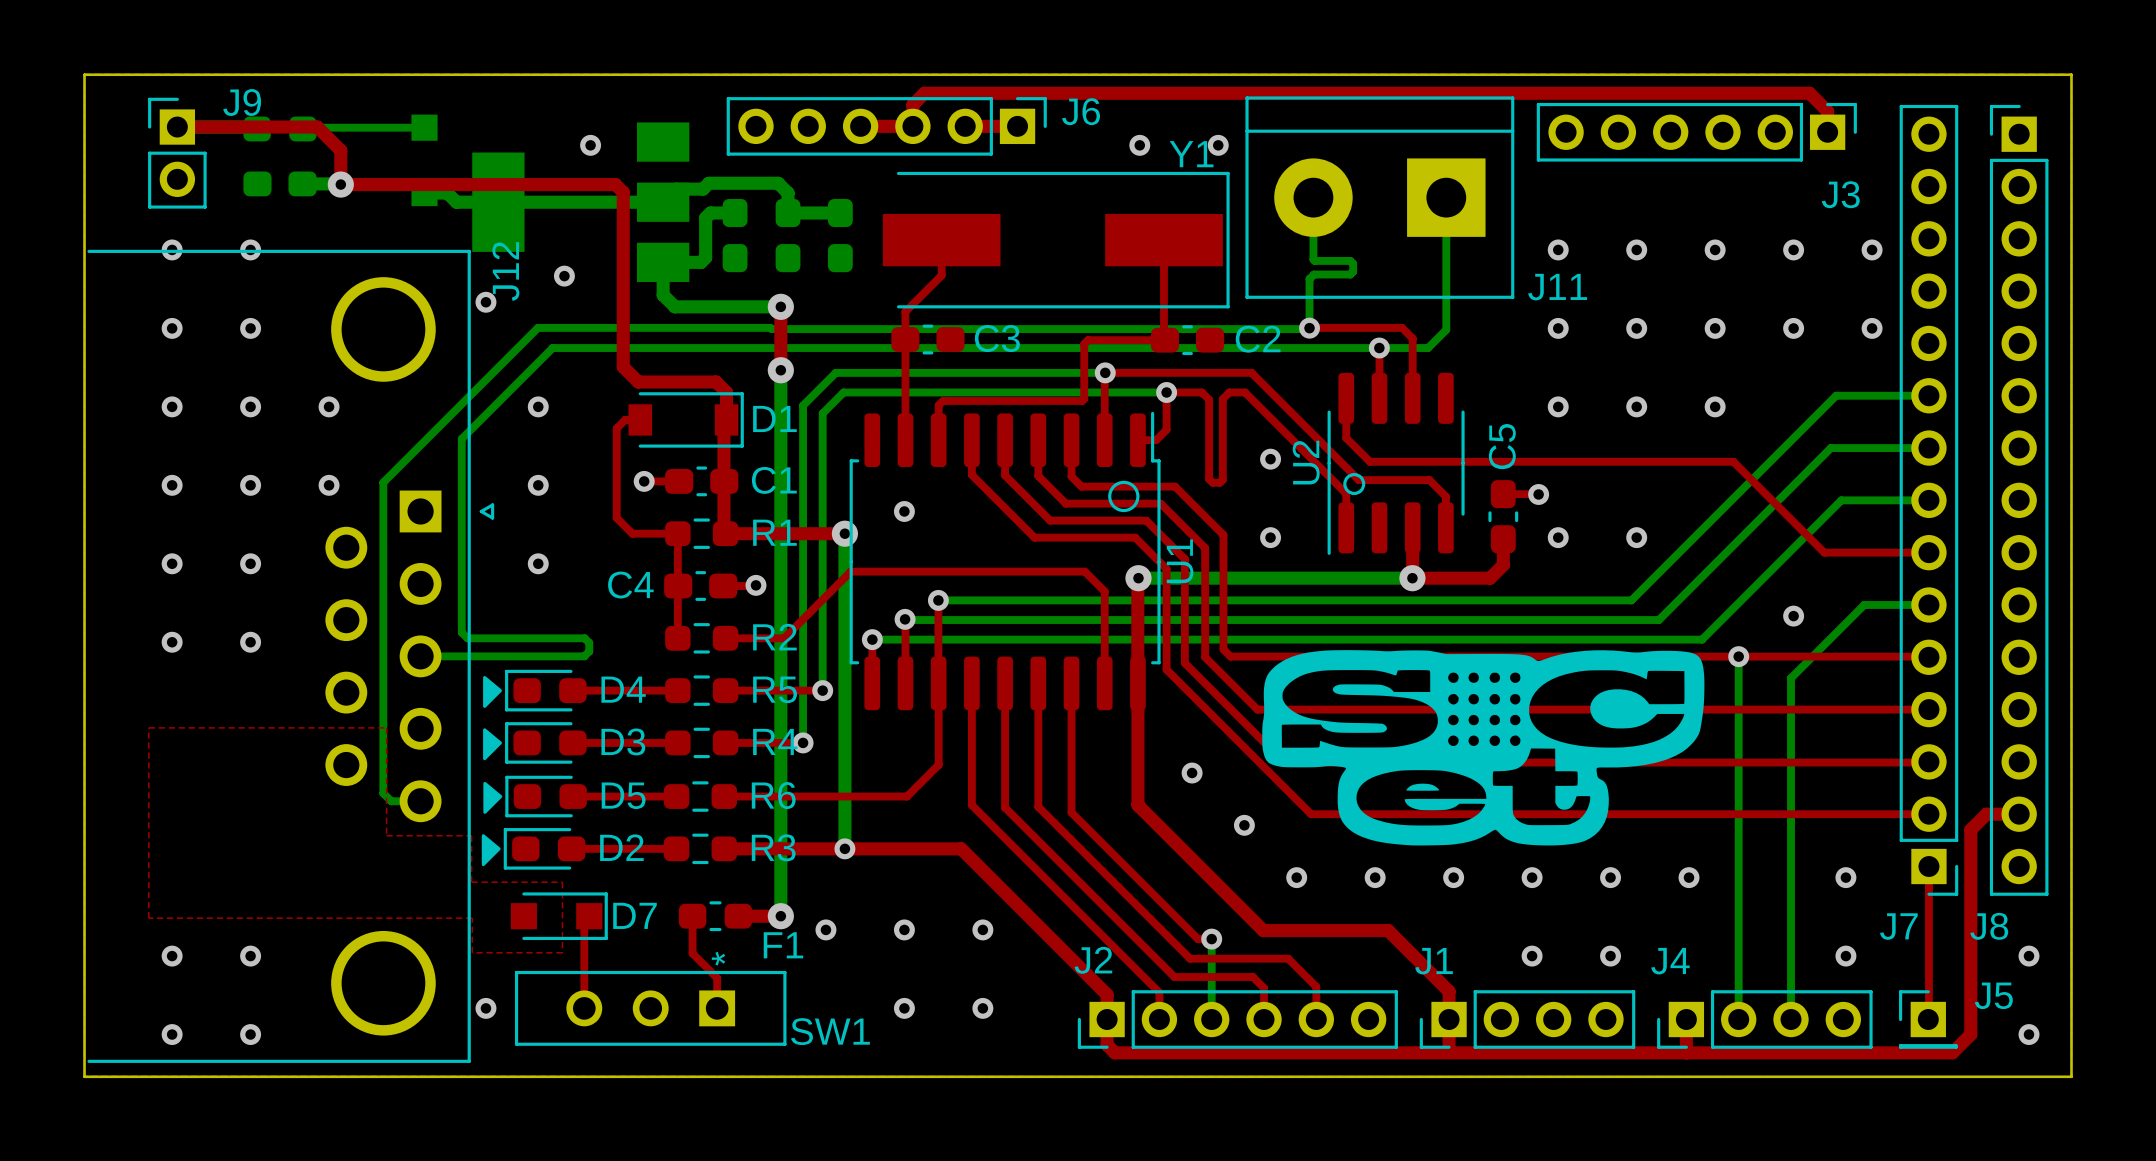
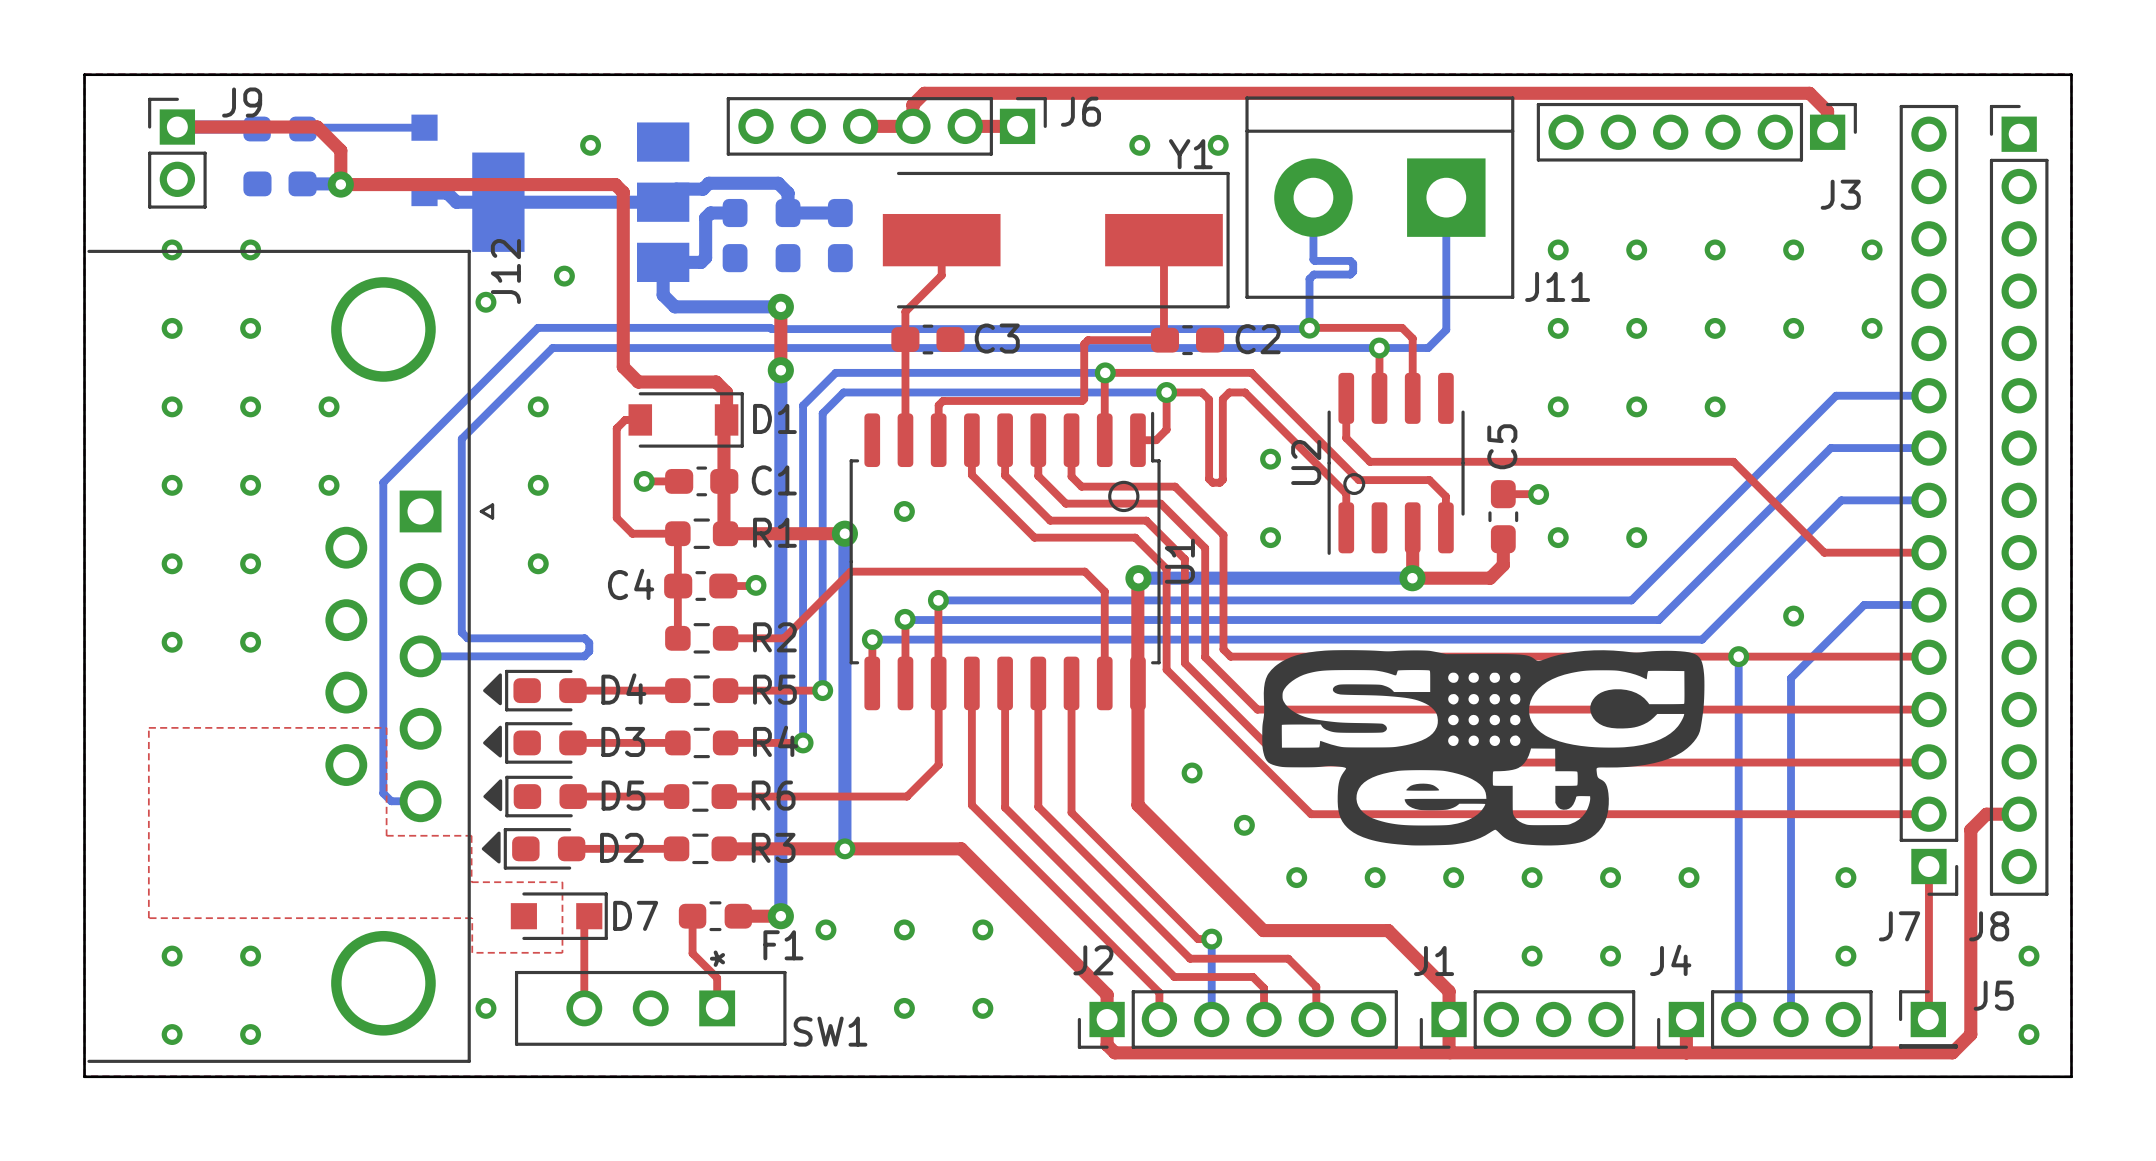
D4 footprint: [483, 669, 587, 712] -> [483, 669, 587, 712]
D3 footprint: [483, 722, 587, 764] -> [483, 722, 587, 764]
D5 footprint: [483, 775, 587, 818] -> [483, 775, 587, 818]
D2 footprint: [481, 828, 586, 870] -> [481, 828, 586, 870]

